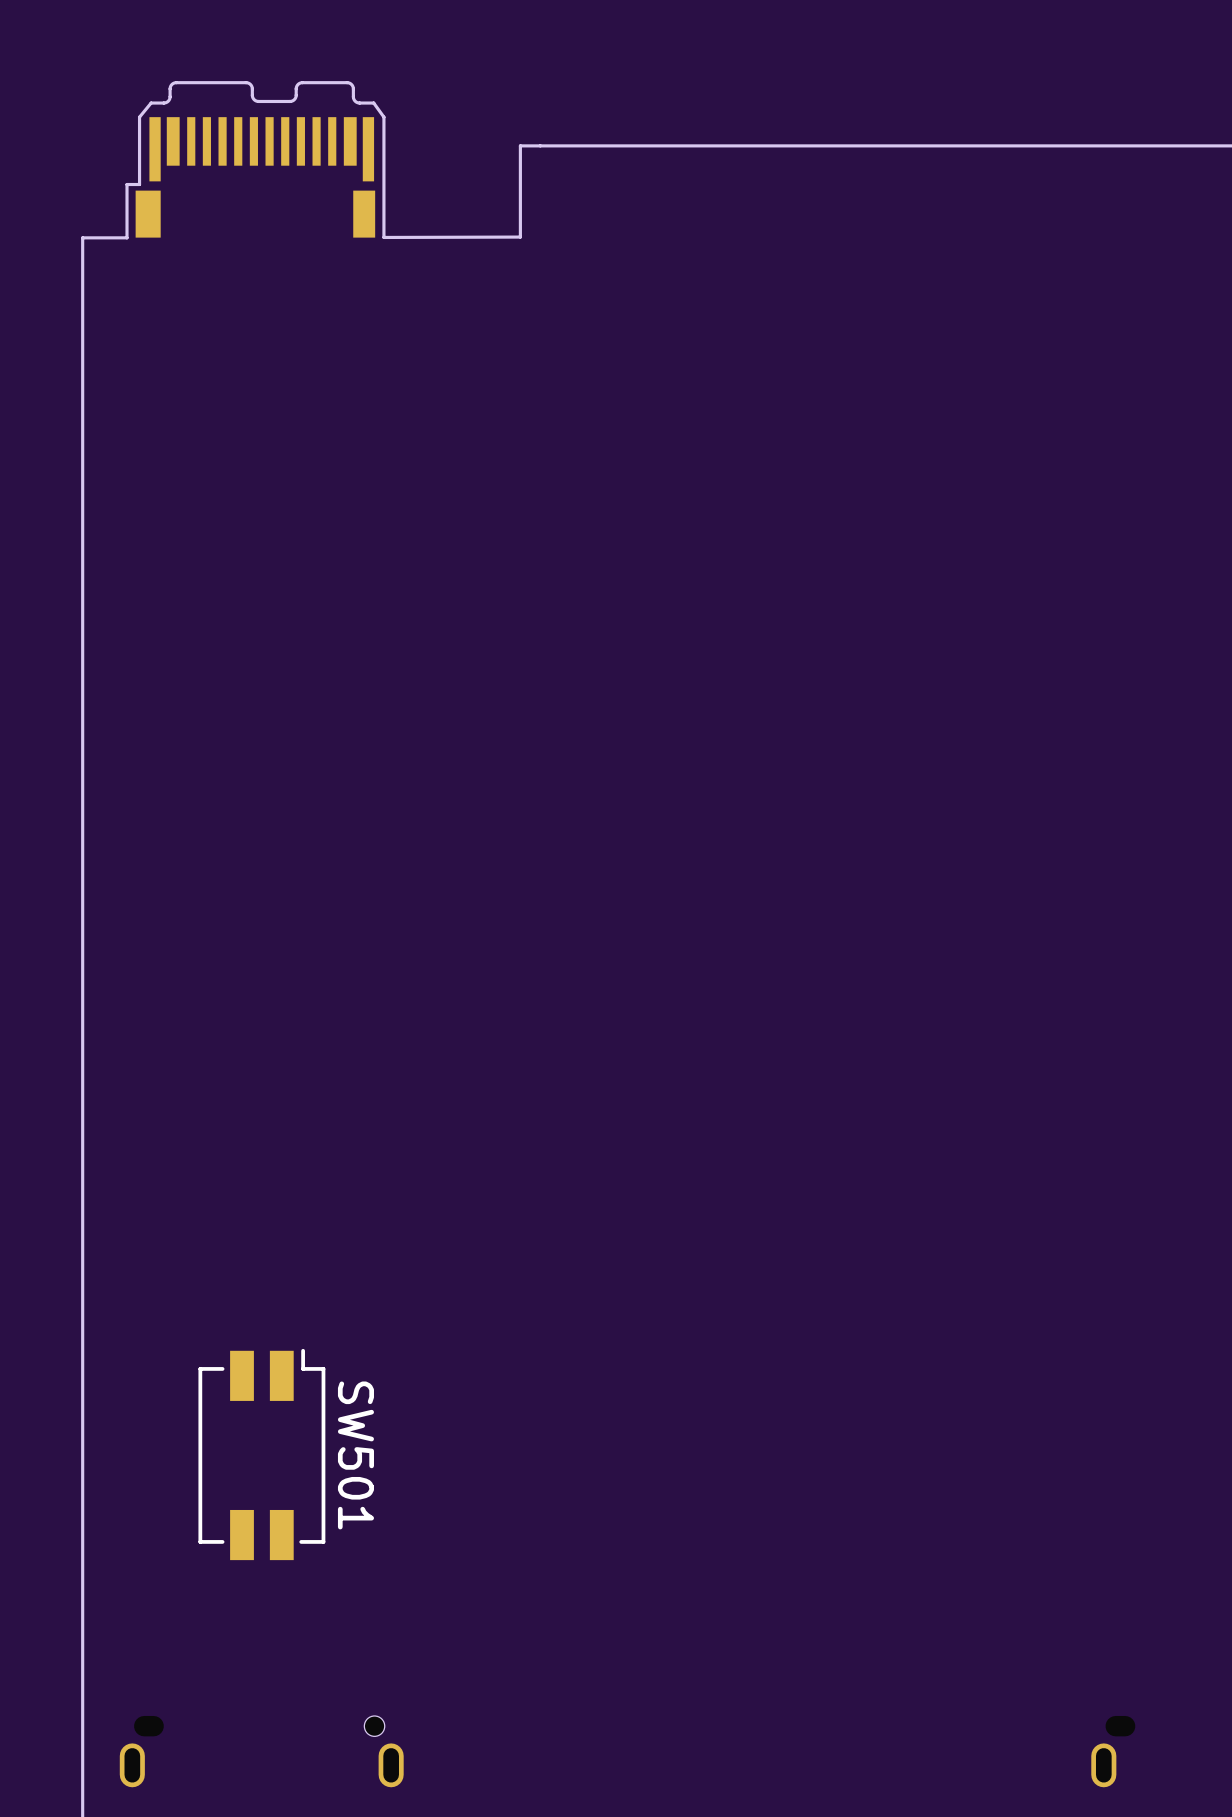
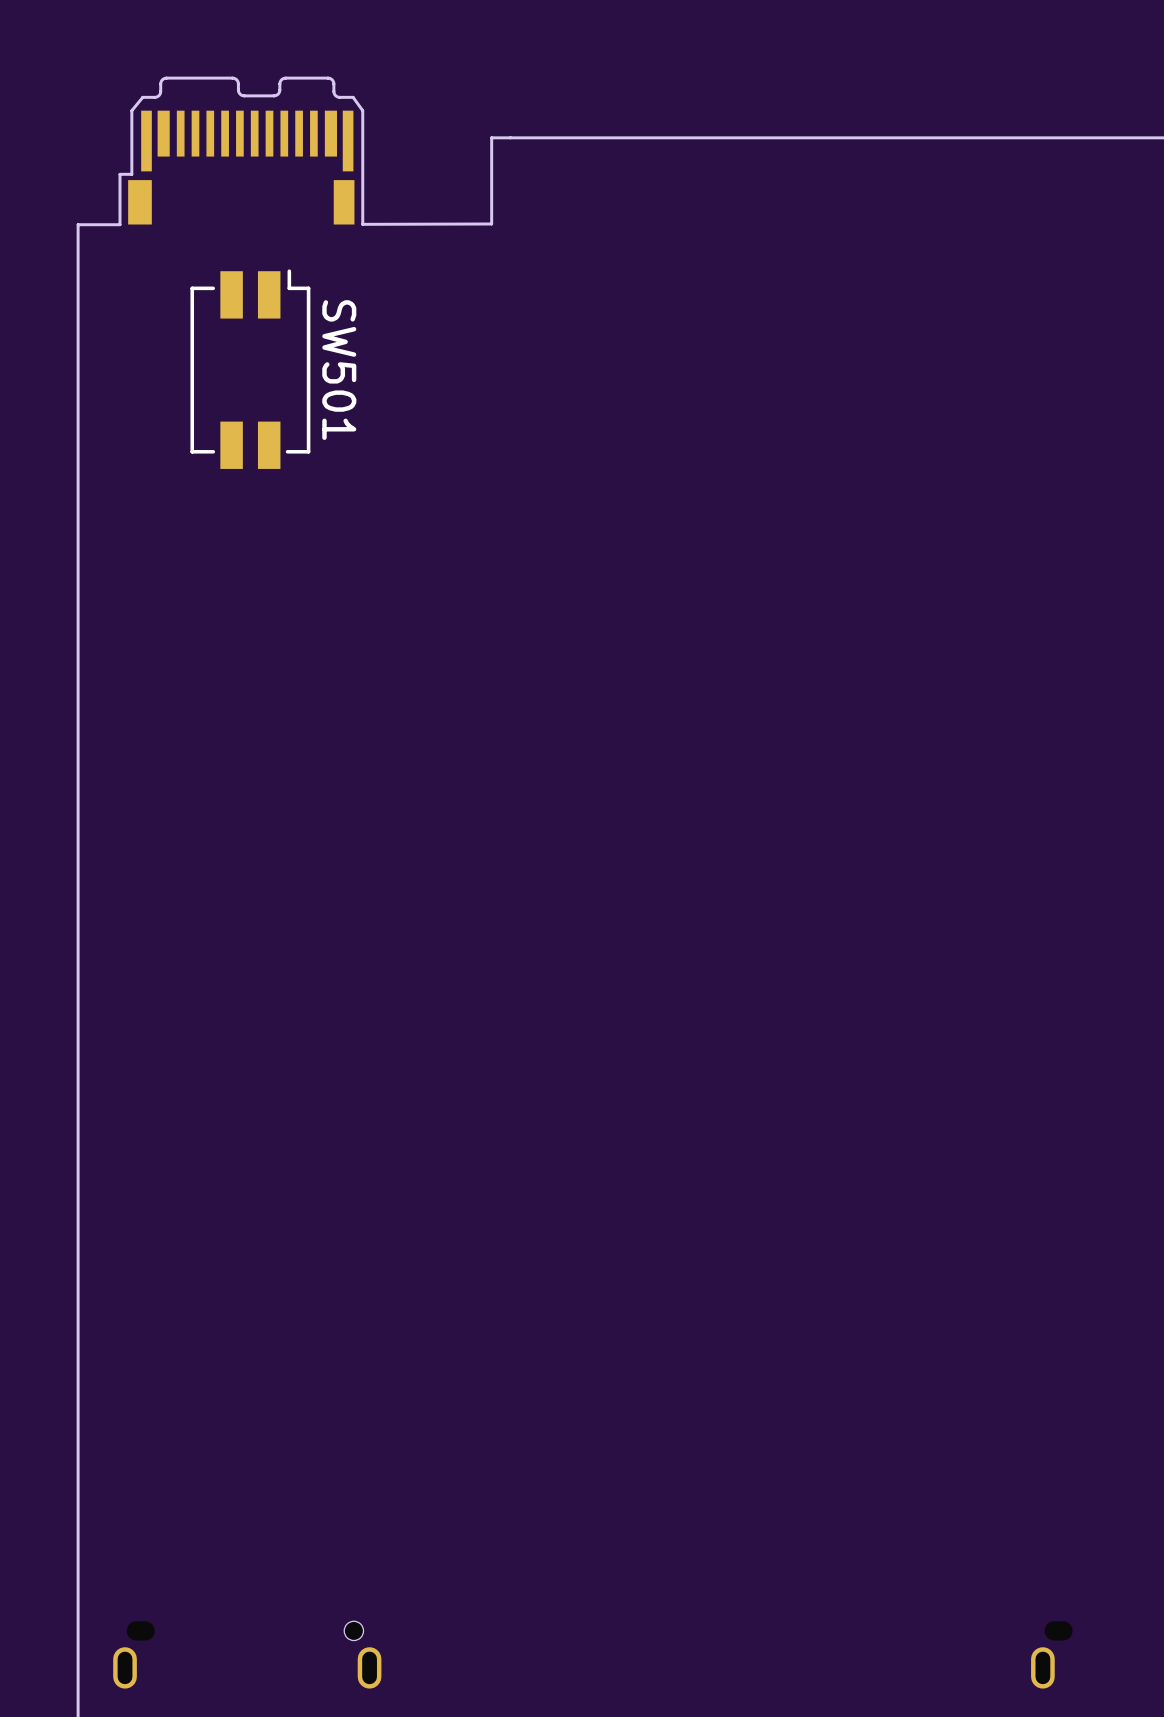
SW501 position: (261, 1454) -> (250, 369)

